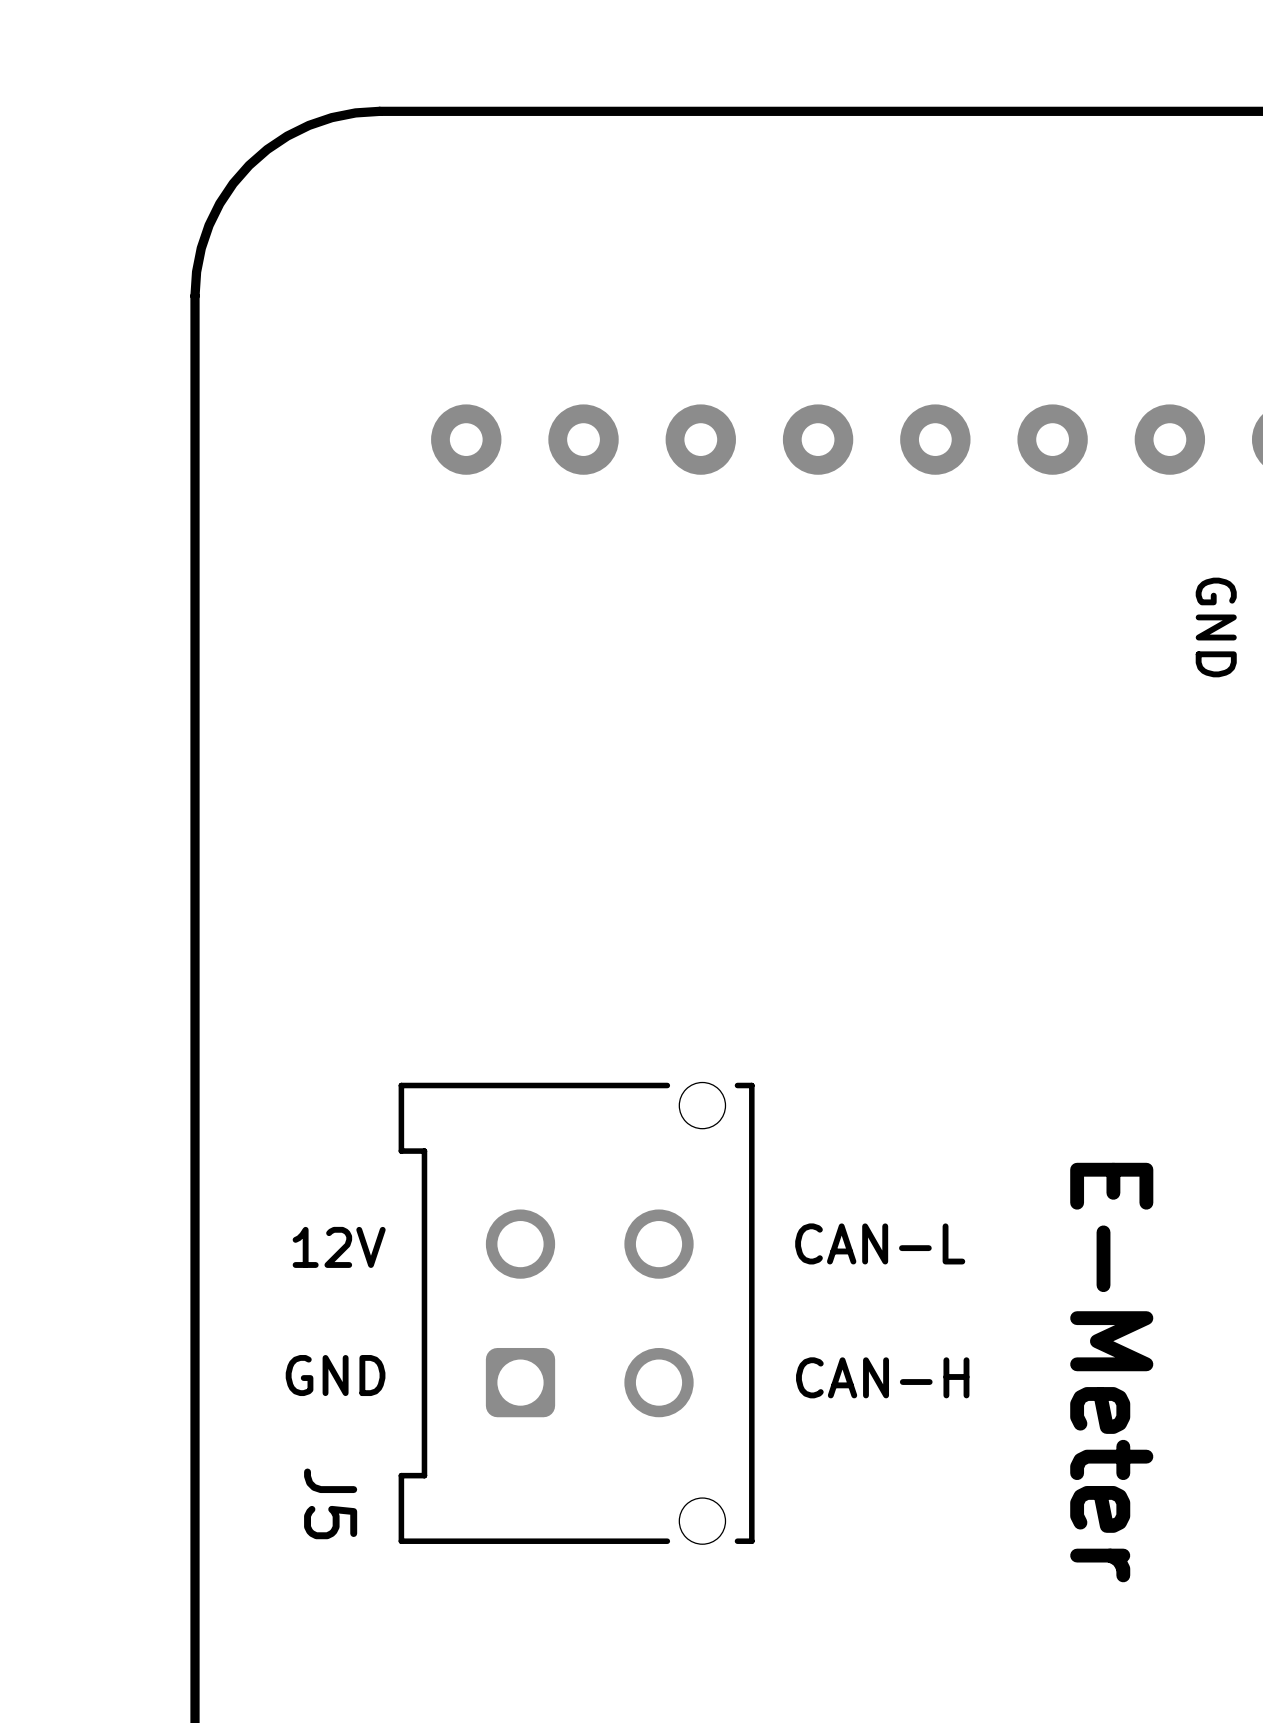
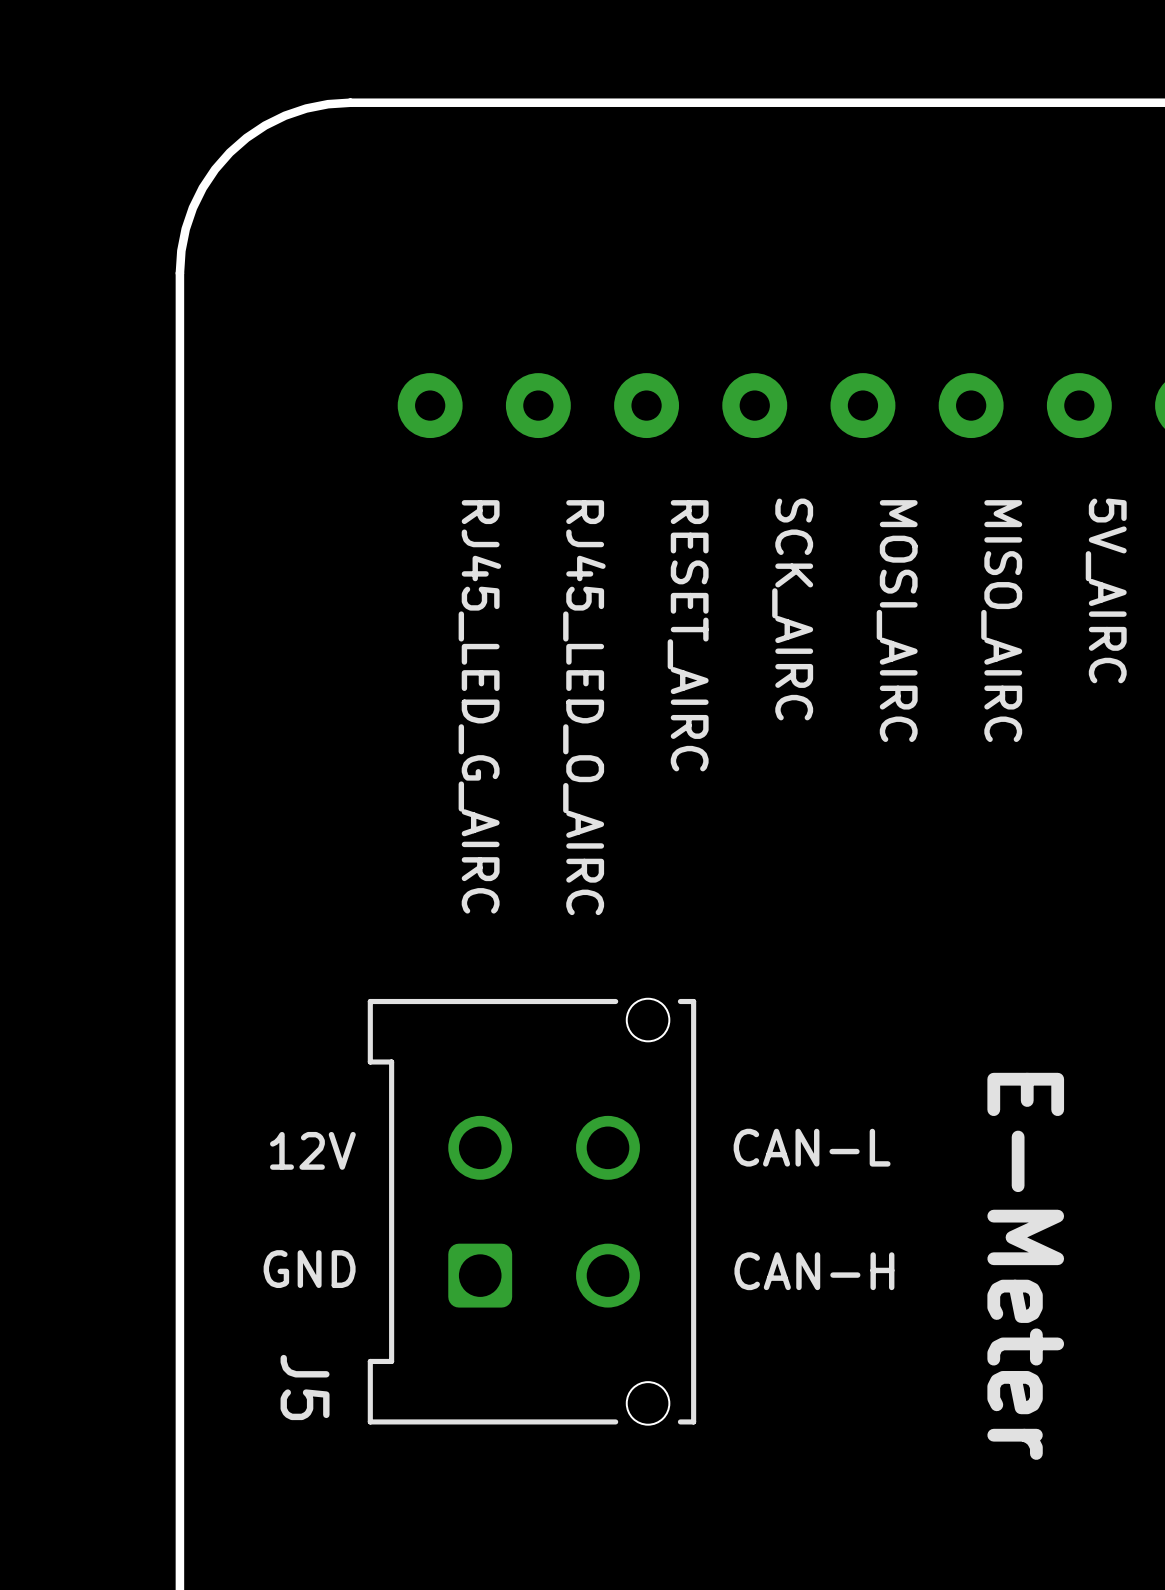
text: GND (1216, 627) -> 5V_AIRC (1106, 590)
text: none -> SCK_AIRC (792, 609)
text: none -> MOSI_AIRC (897, 621)
text: none -> MISO_AIRC (1001, 621)
text: none -> RESET_AIRC (688, 635)
text: none -> RJ45_LED_G_AIRC (479, 706)
text: none -> RJ45_LED_O_AIRC (584, 707)

